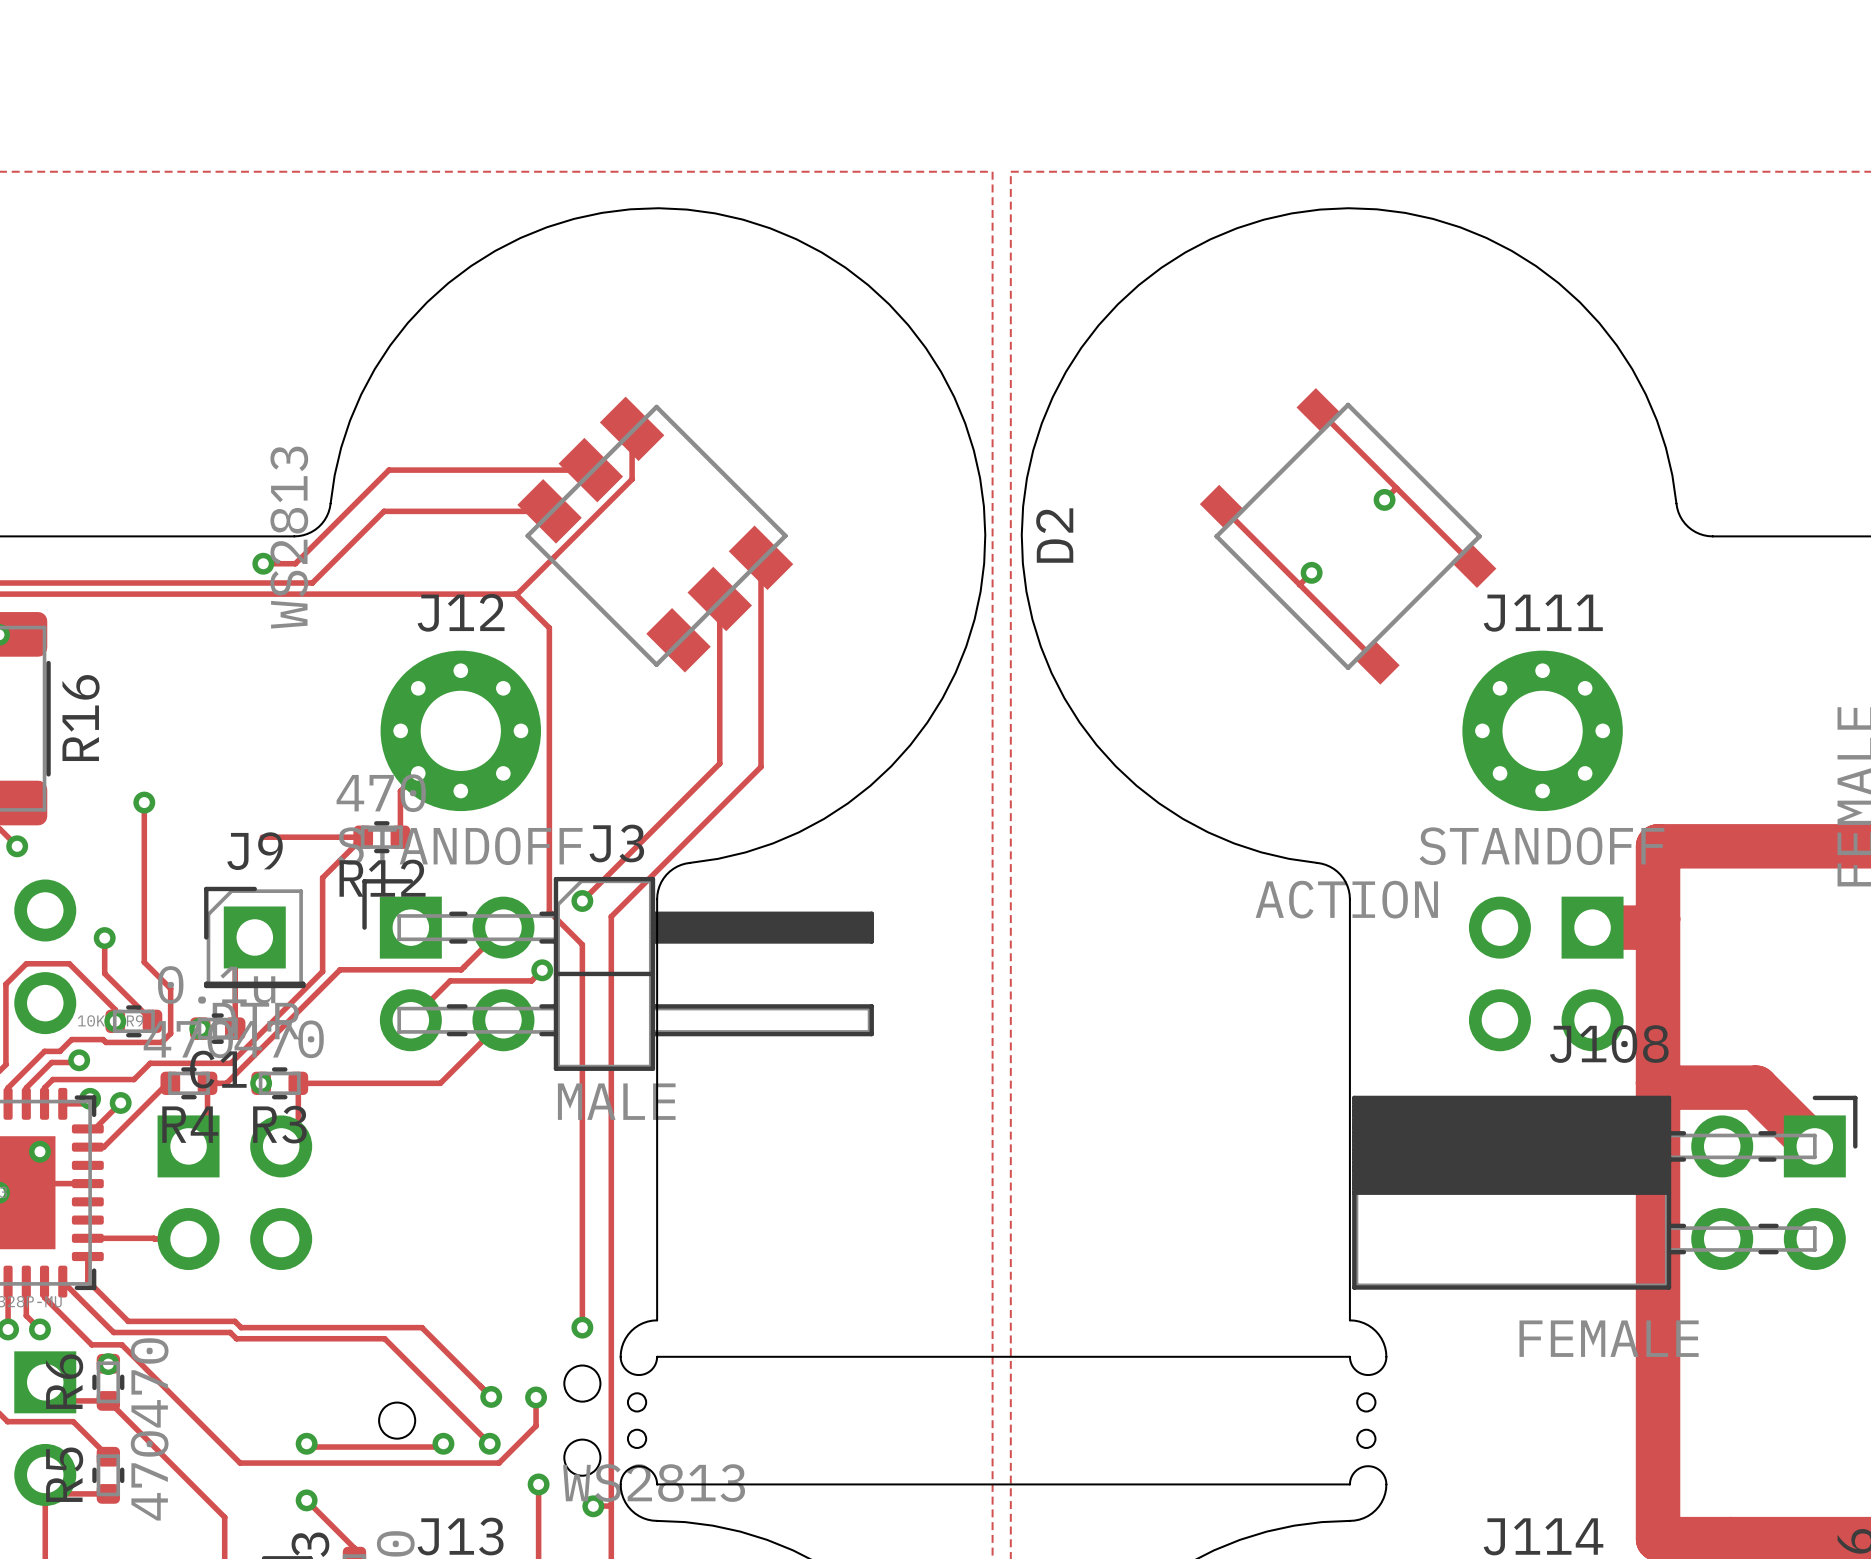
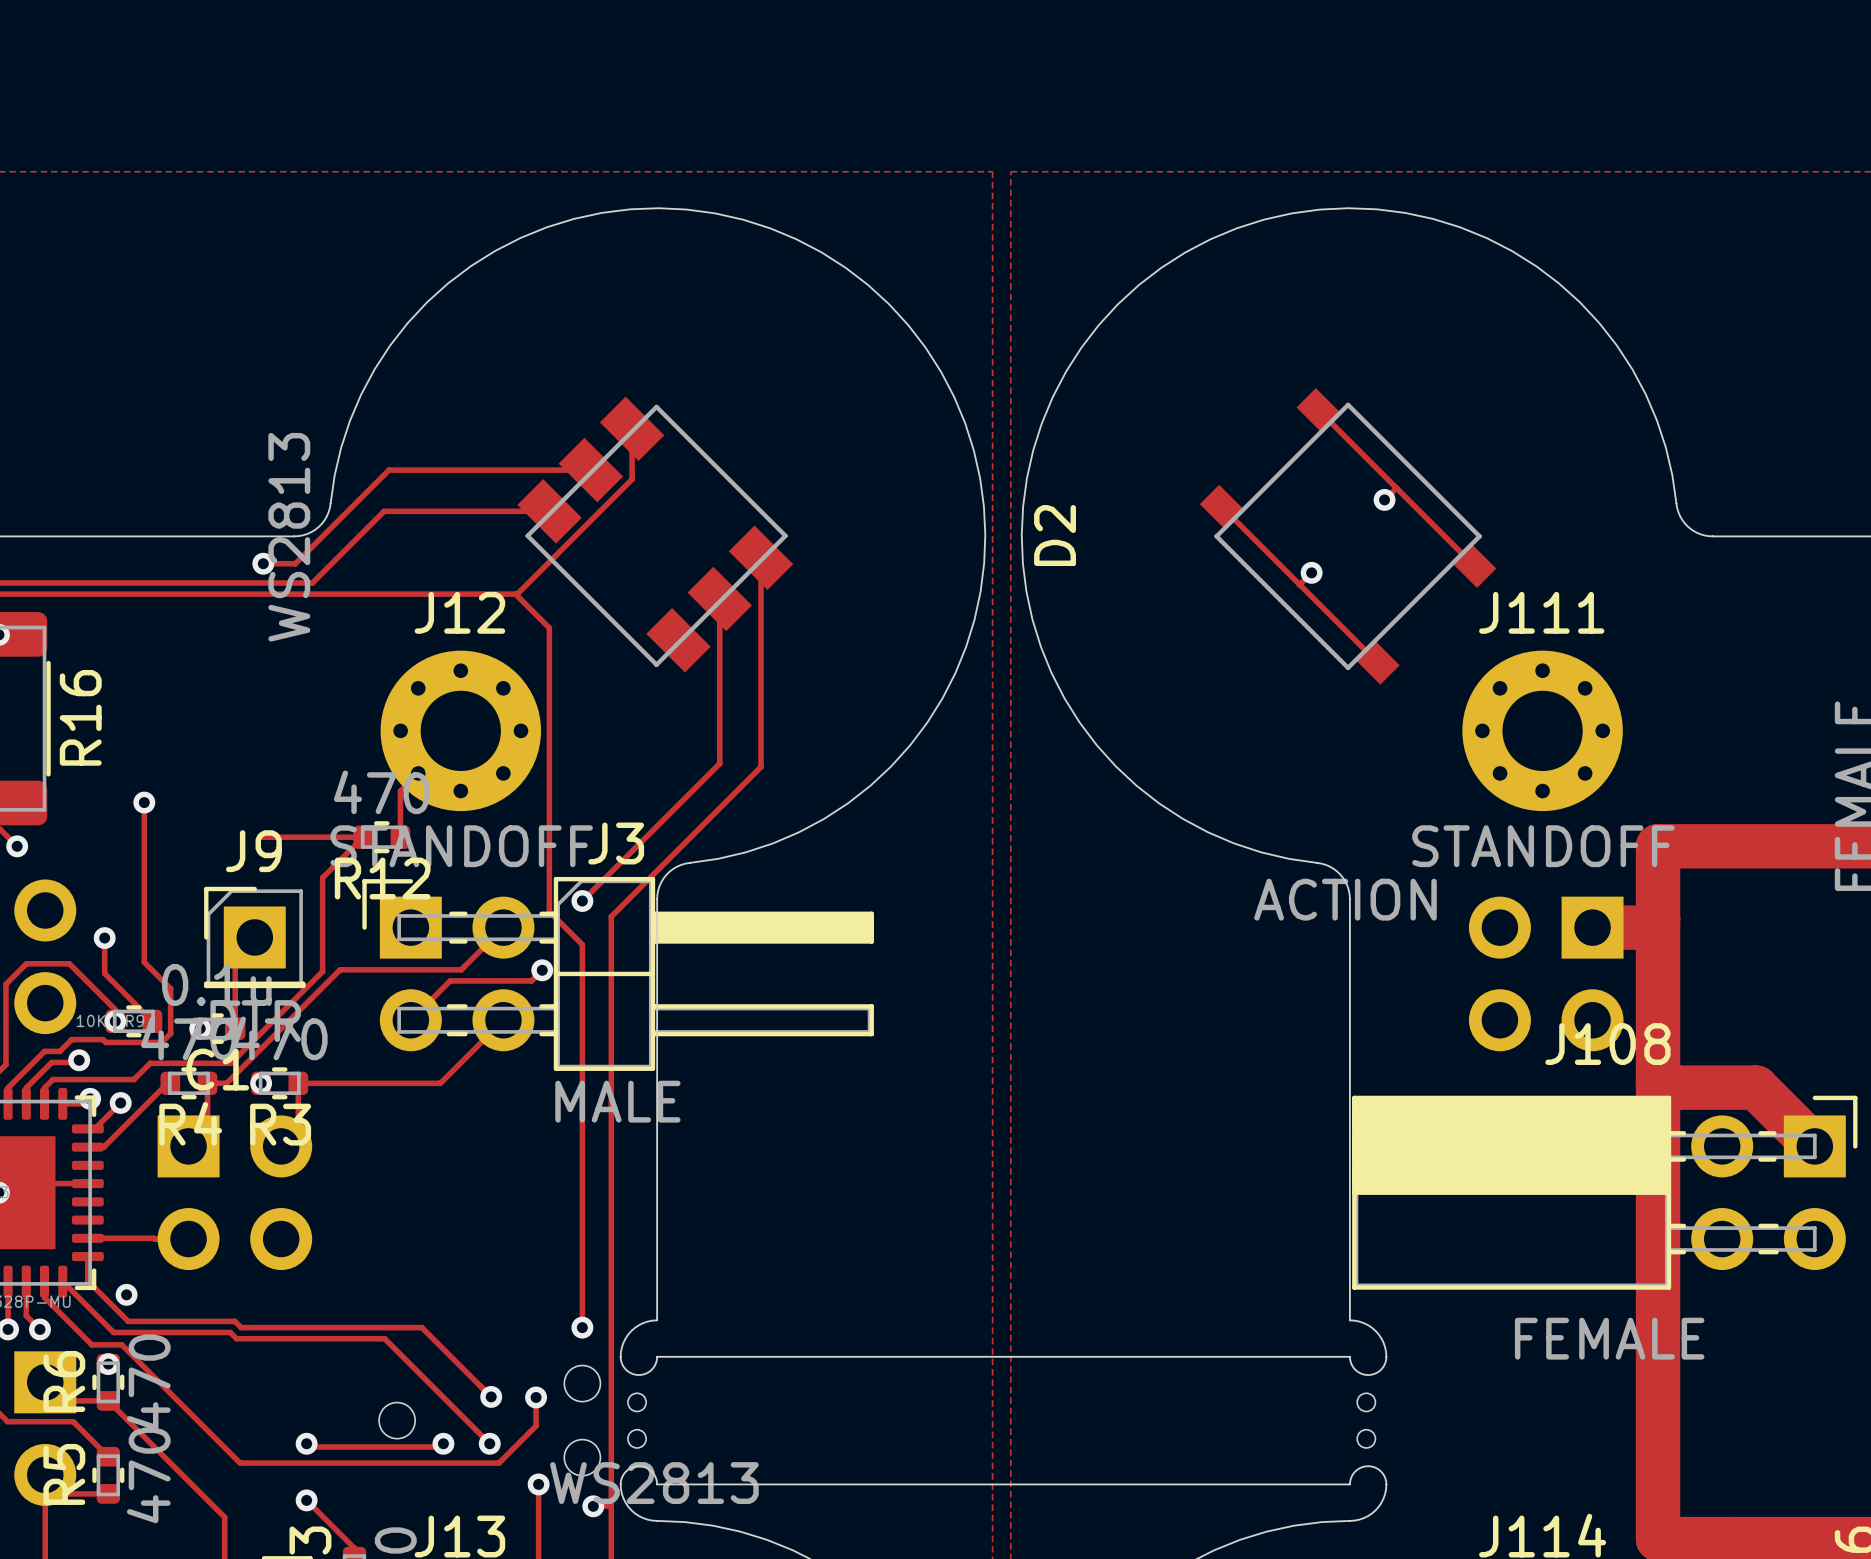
via: (39, 1151) -> none
via: none -> (126, 1294)

